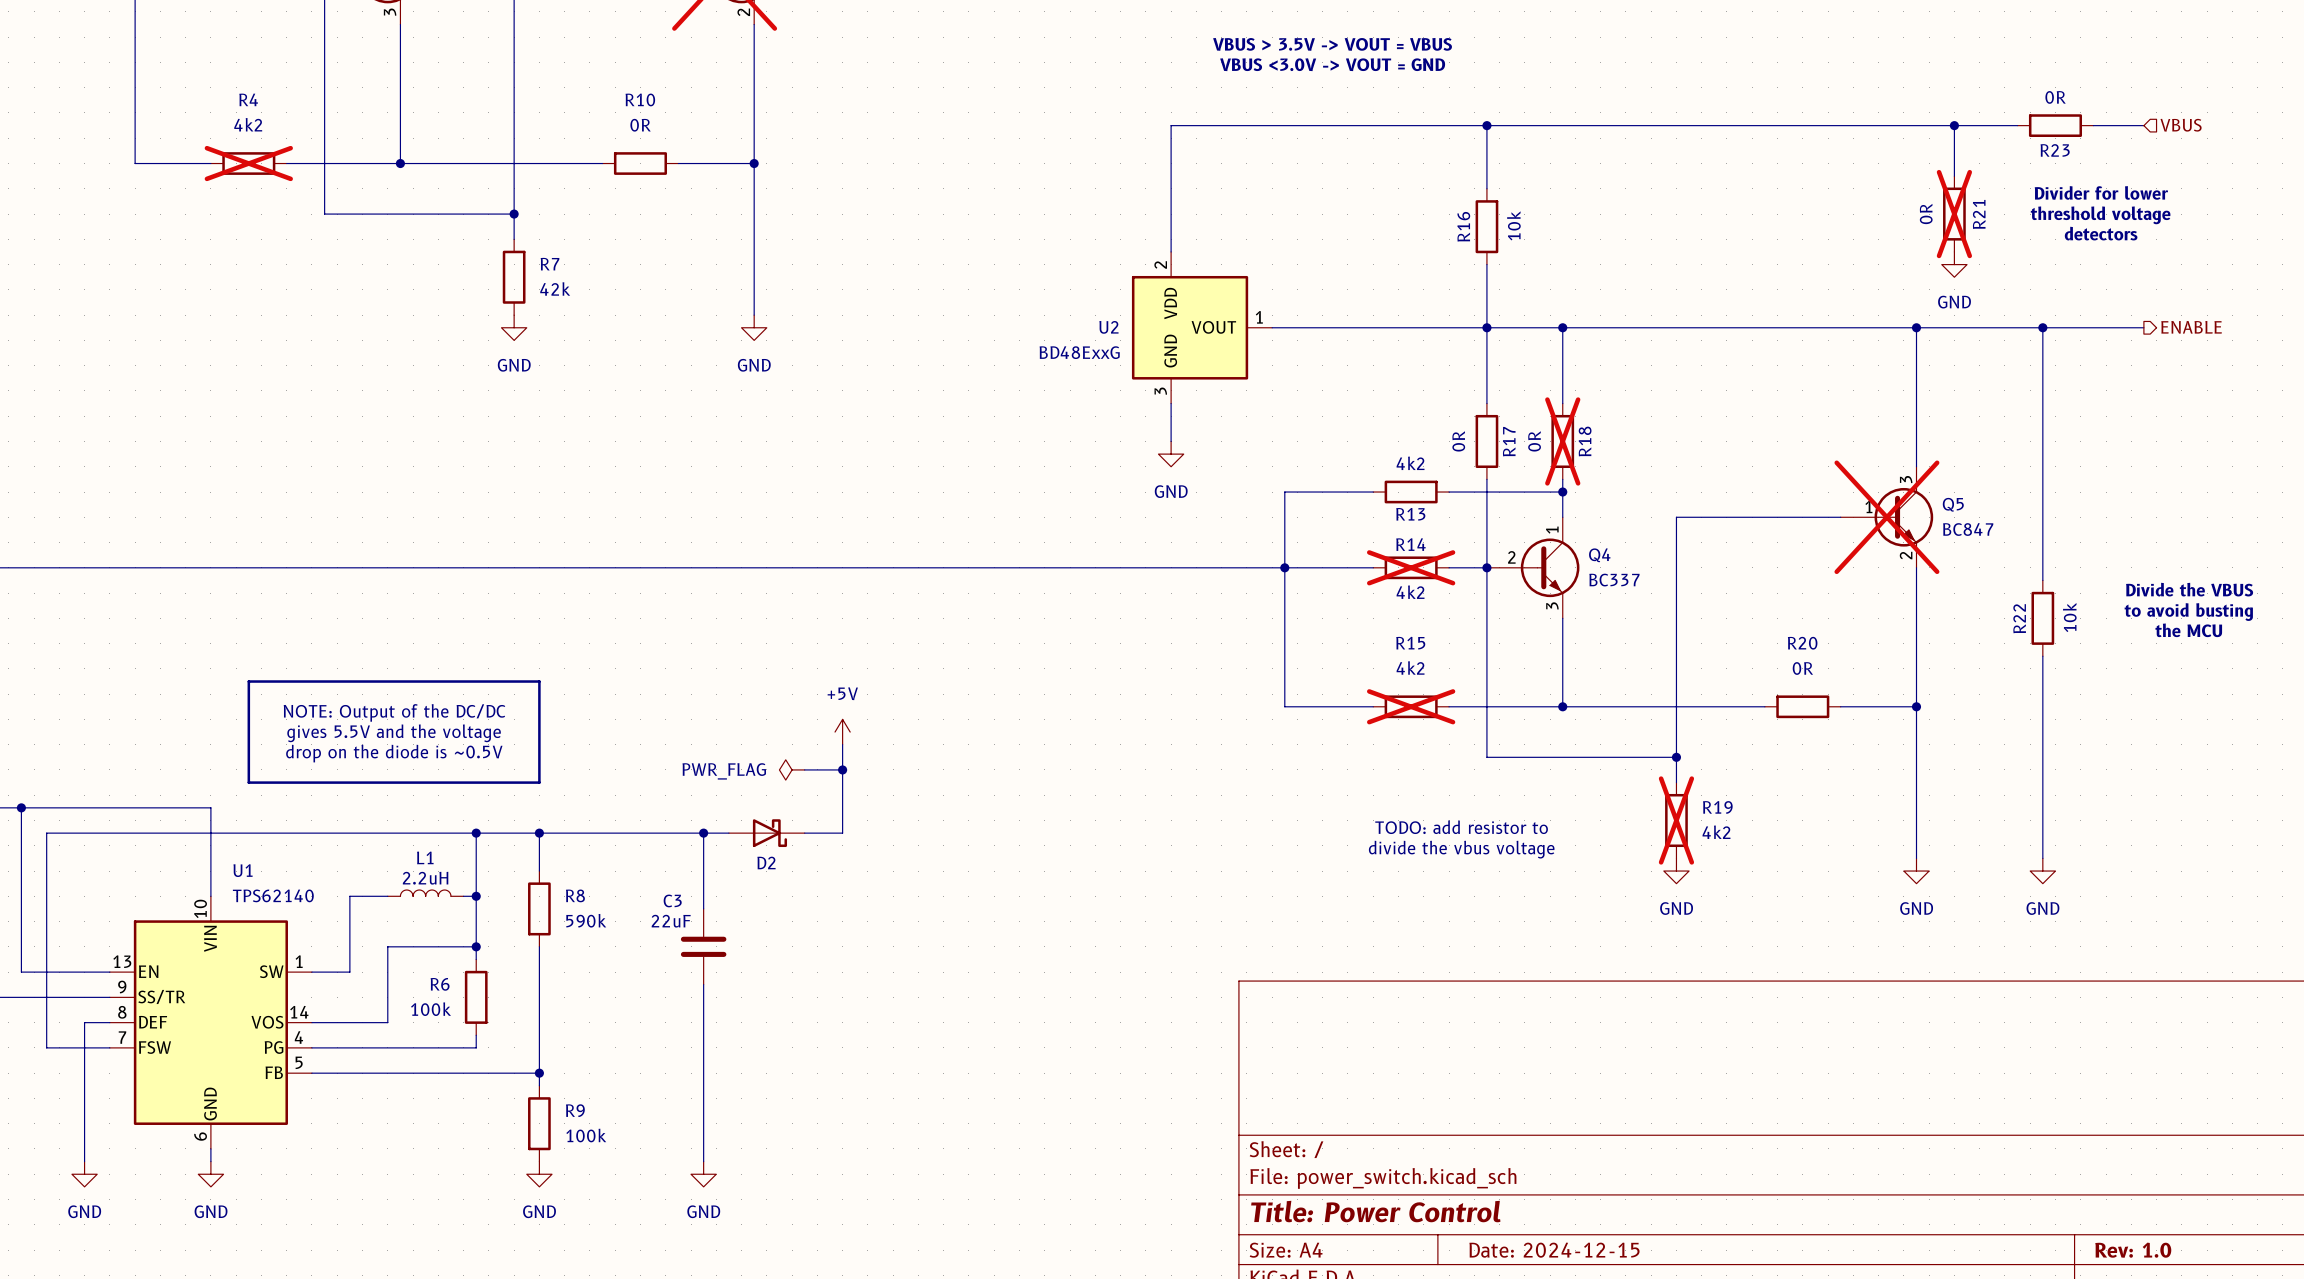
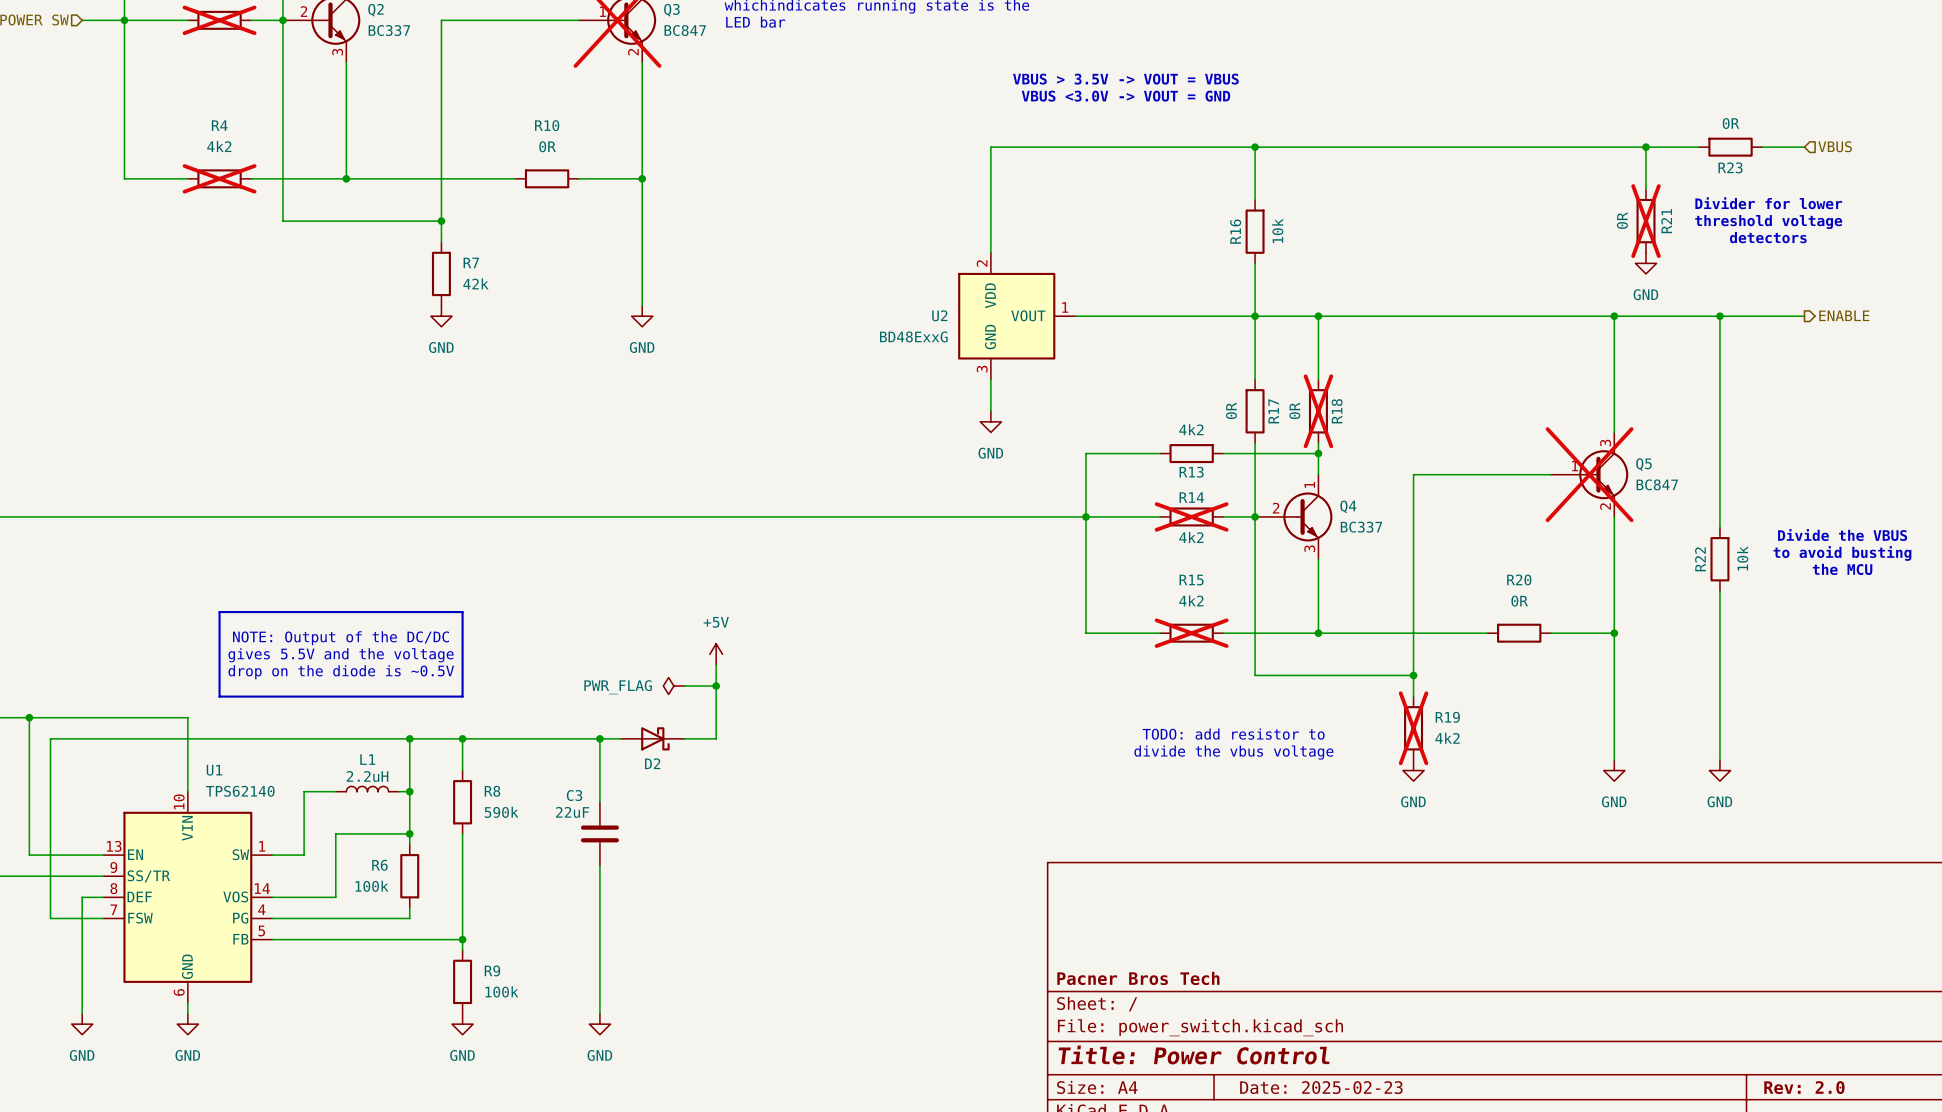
title block: none -> Pacner Bros Tech (1138, 978)
title block: Date: 2024-12-15 (1554, 1250) -> Date: 2025-02-23 (1321, 1087)
title block: Rev: 1.0 (2133, 1250) -> Rev: 2.0 (1804, 1087)

